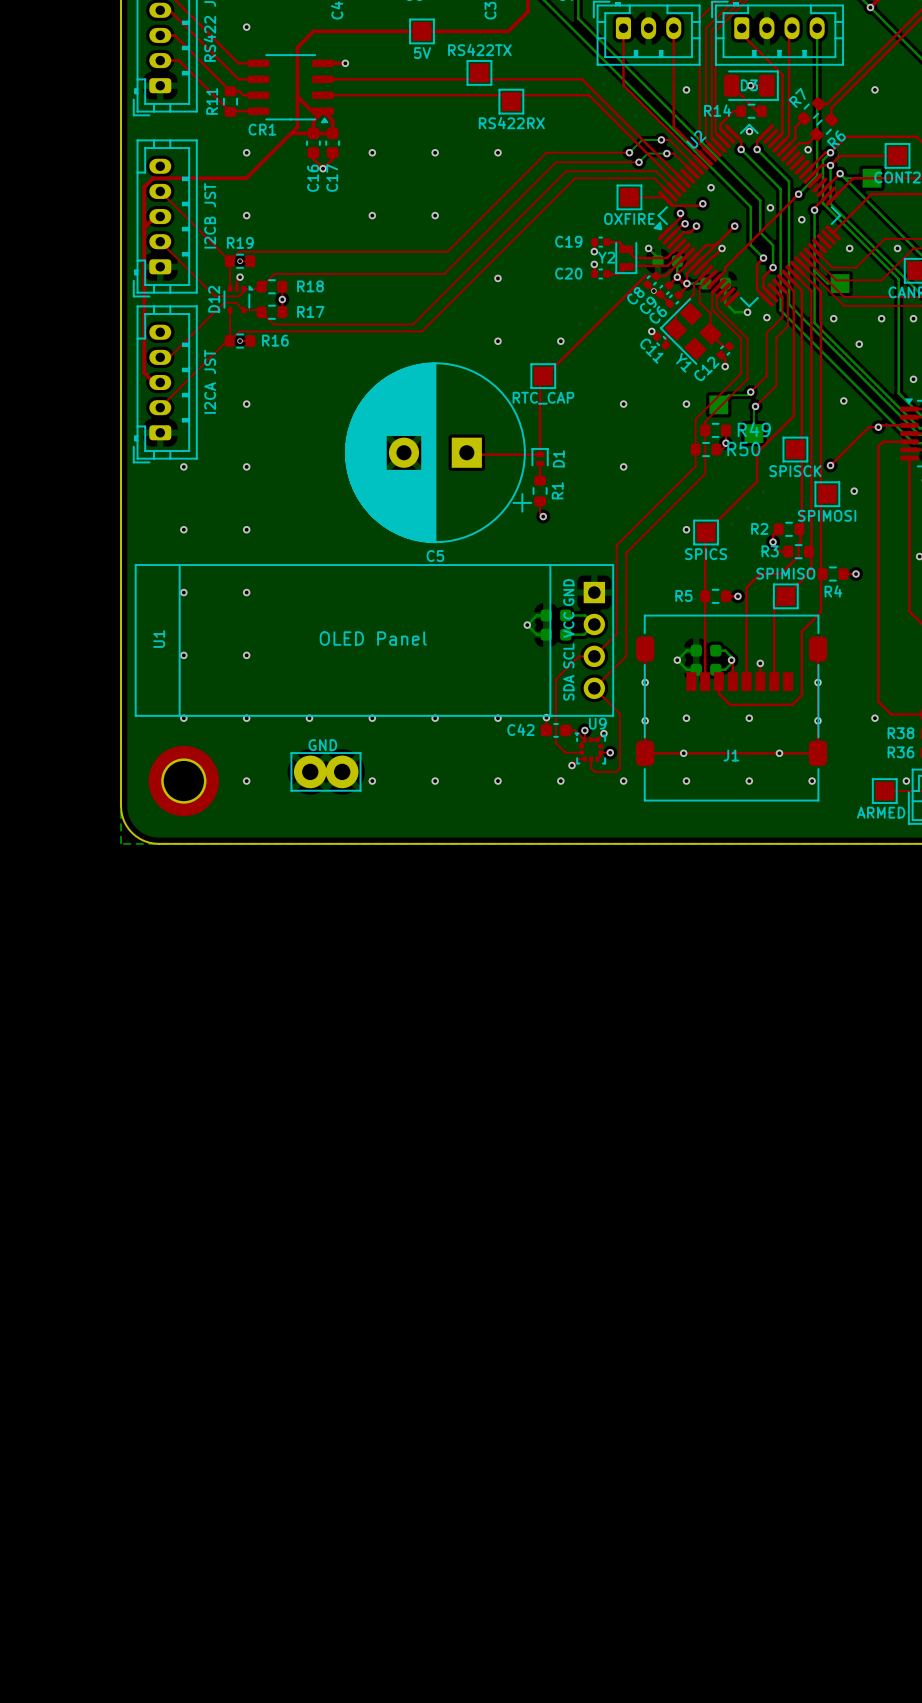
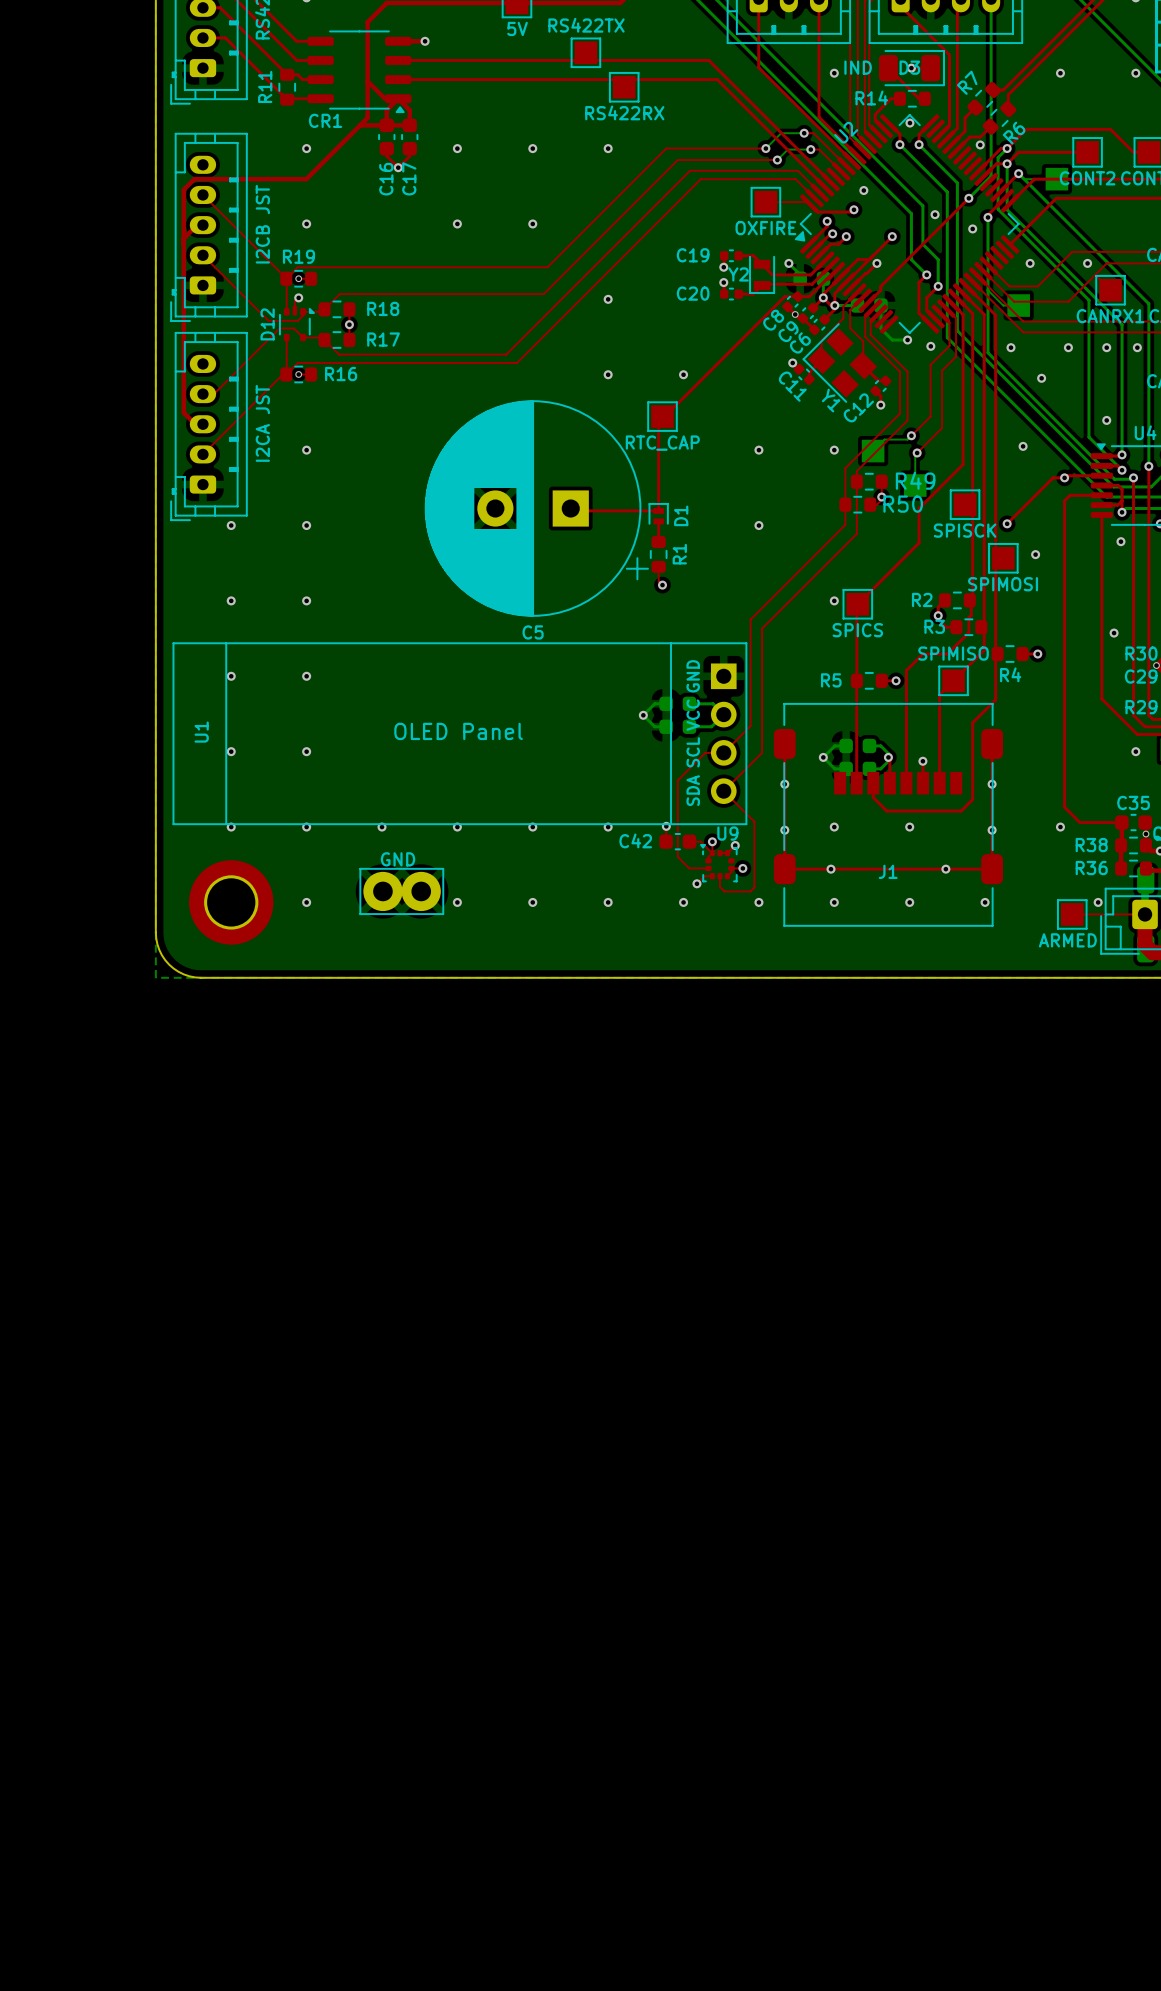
text: none -> IND (858, 67)

